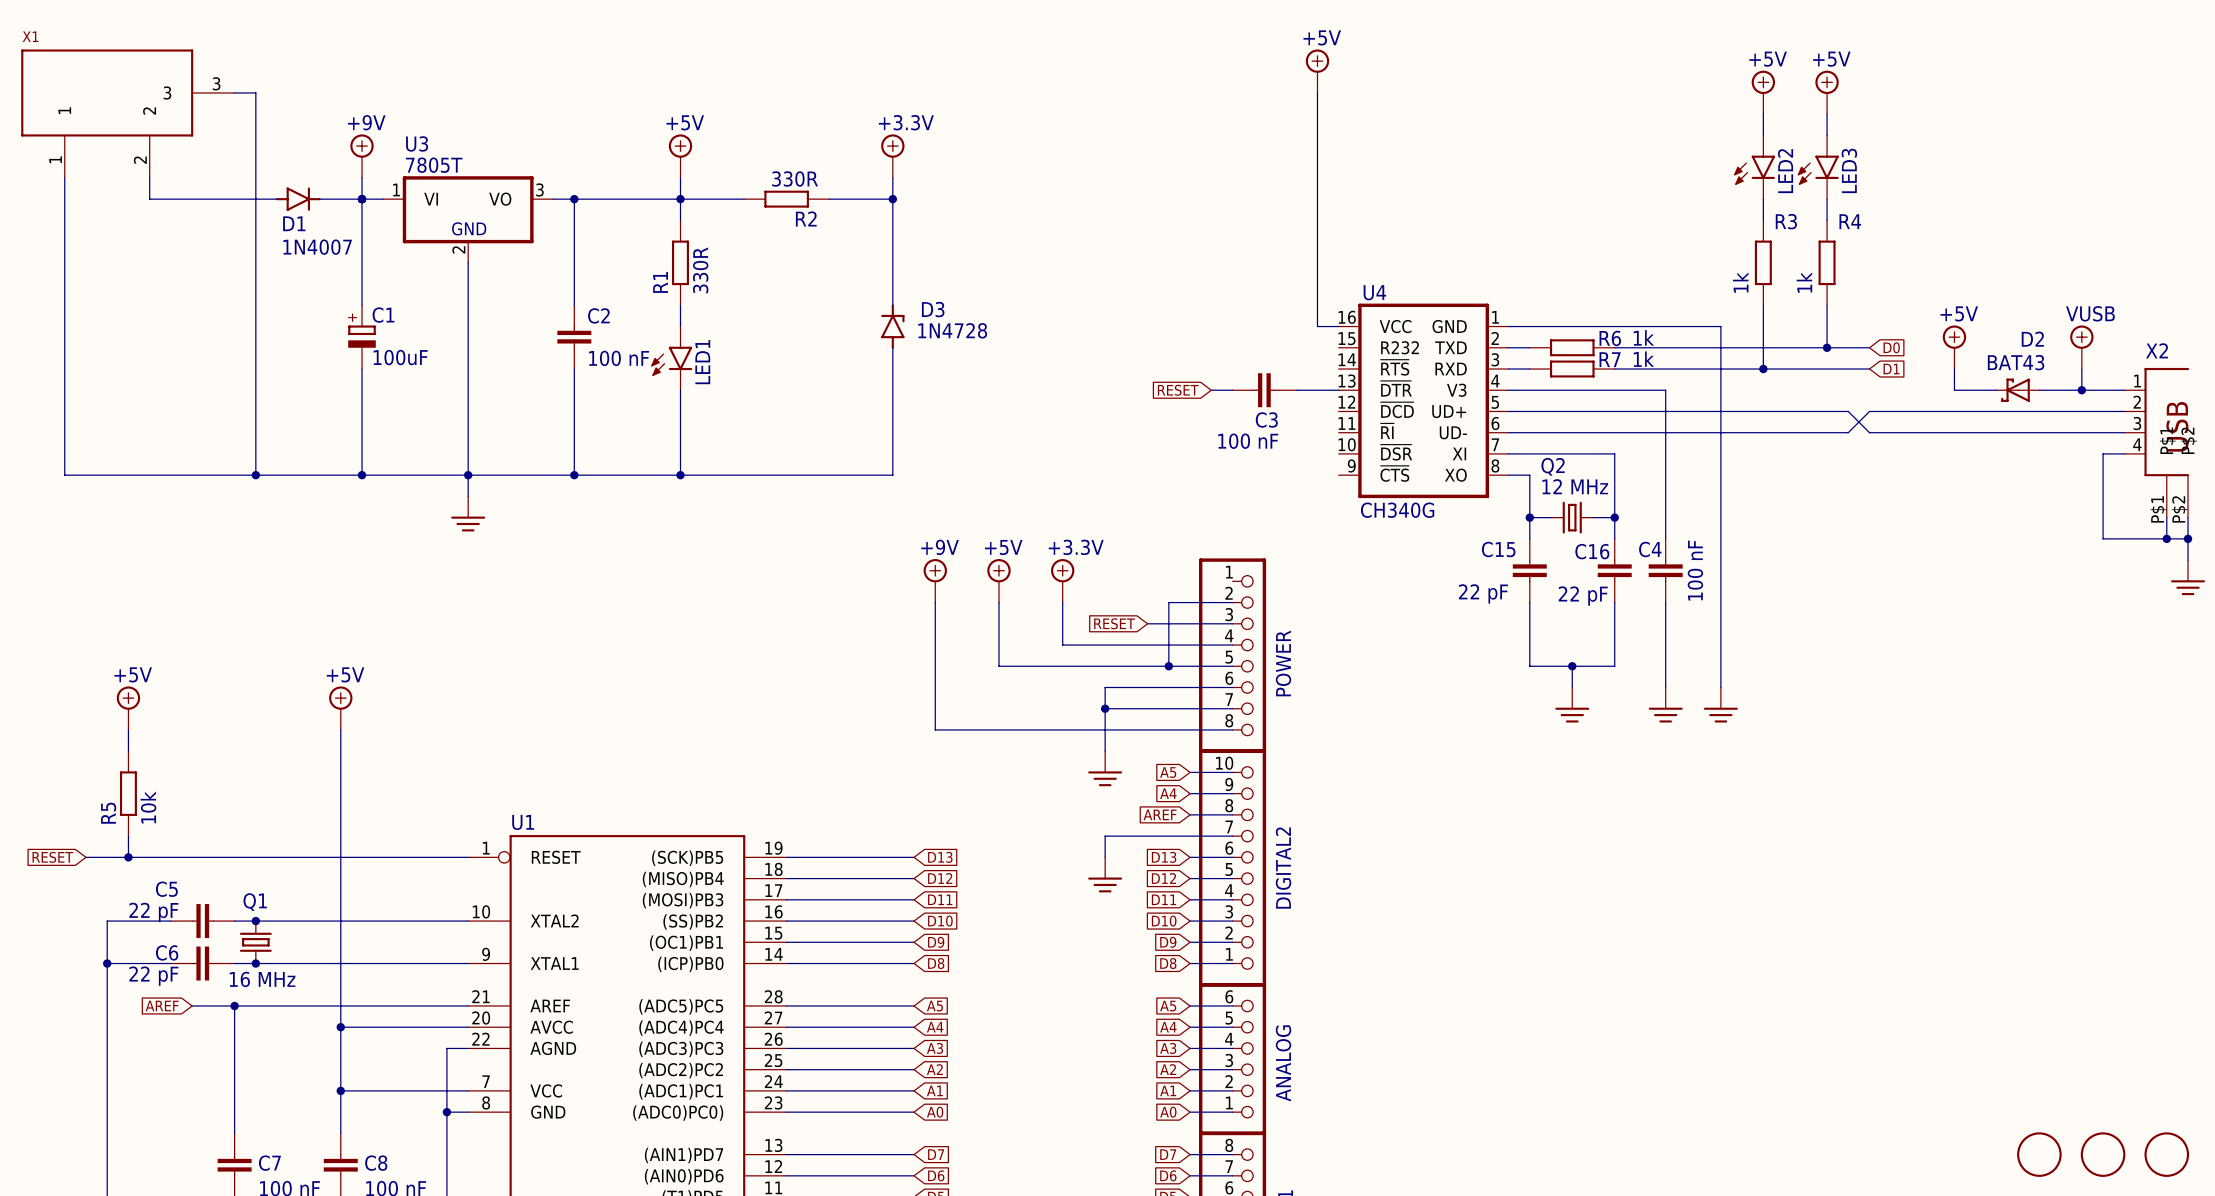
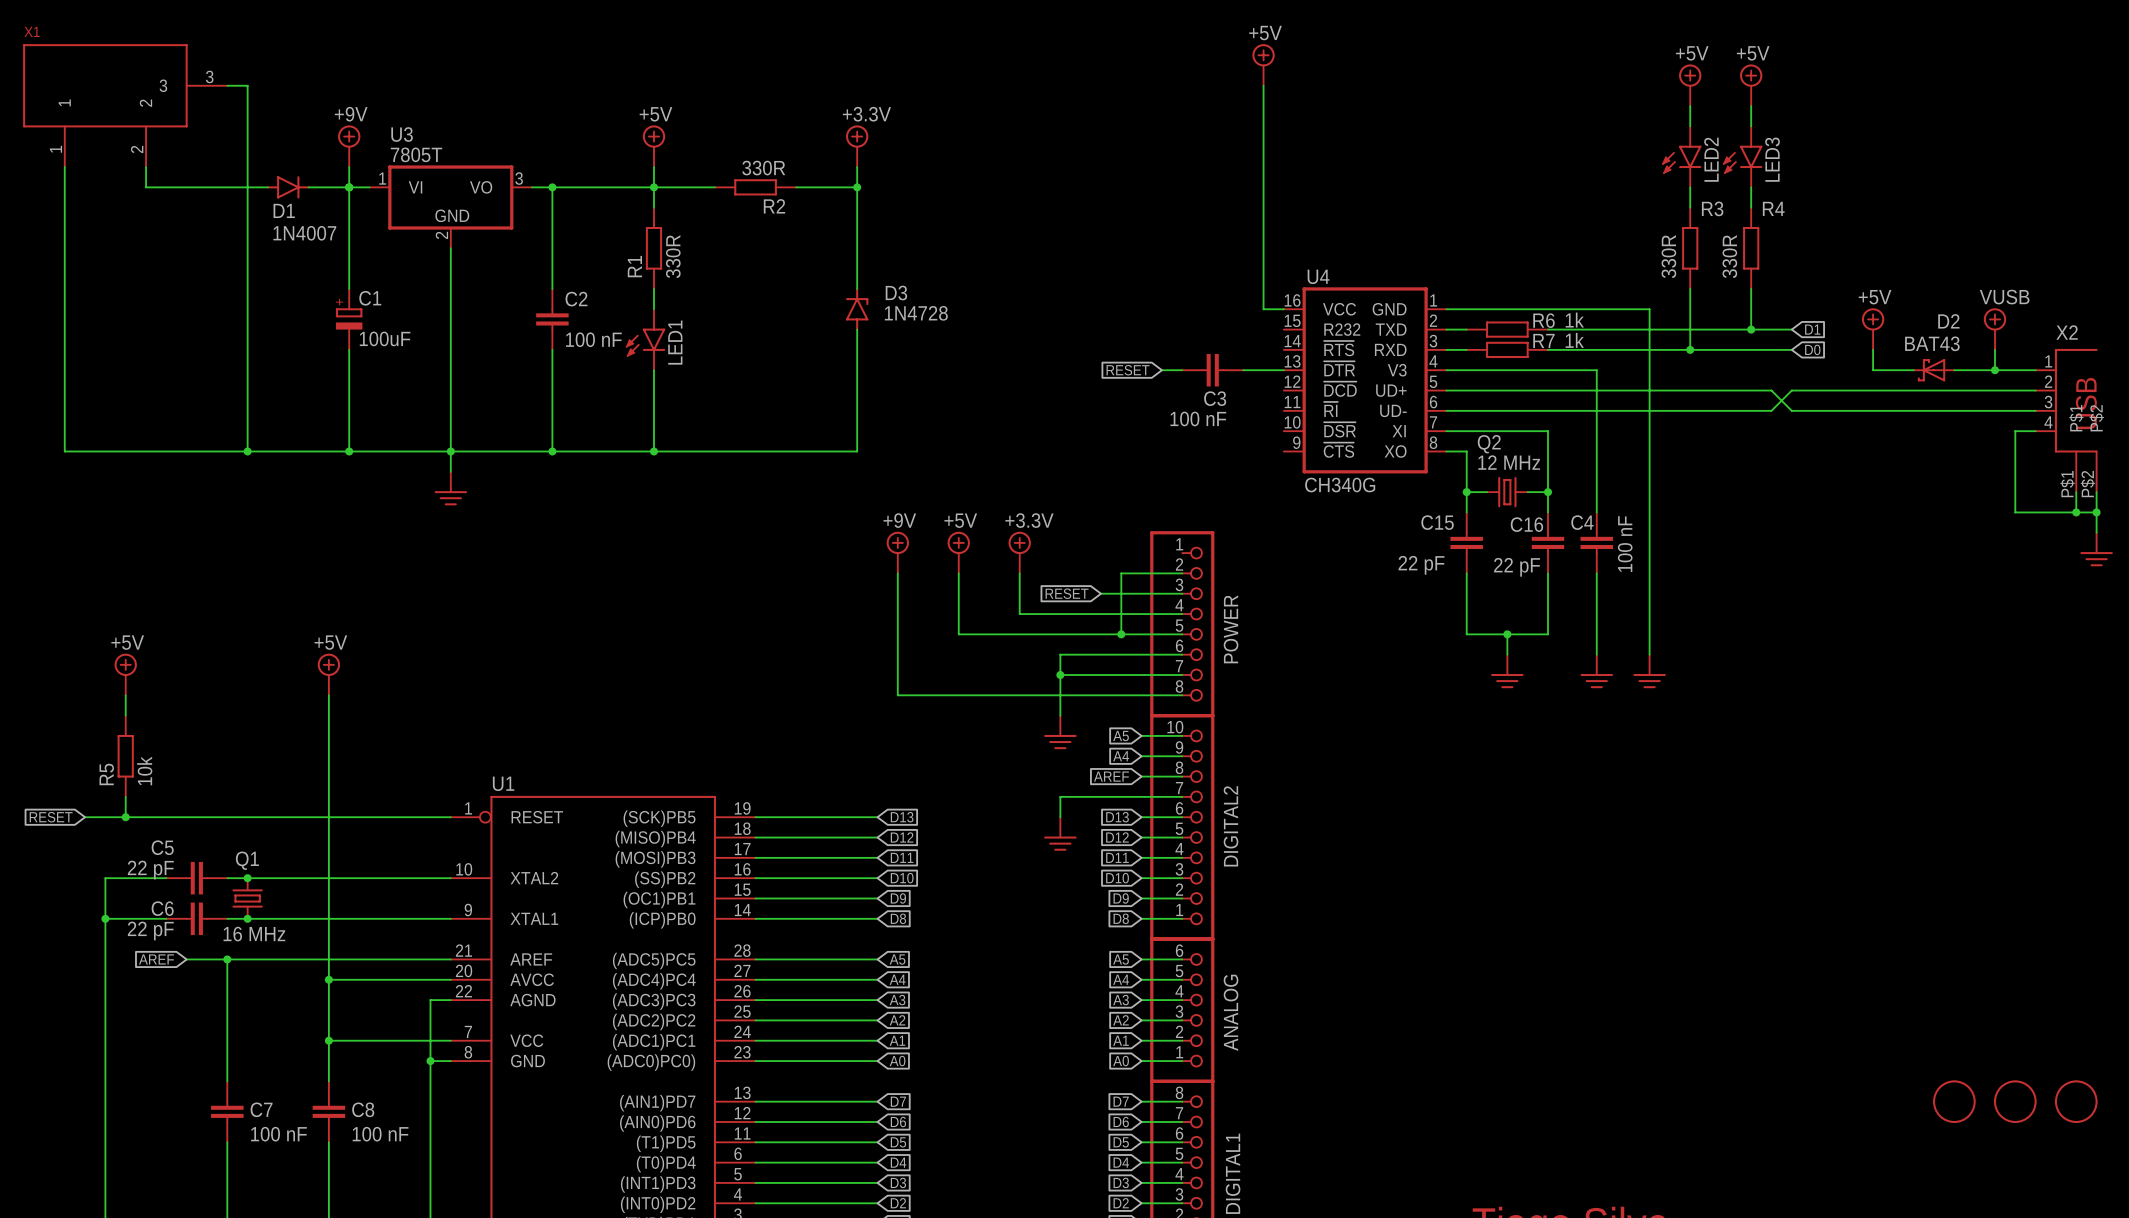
R3 value: 1k (1740, 282) -> 330R (1668, 256)
R4 value: 1k (1804, 282) -> 330R (1729, 256)
global label: D0 (1891, 347) -> D1 (1812, 329)
global label: D1 (1891, 369) -> D0 (1812, 349)

